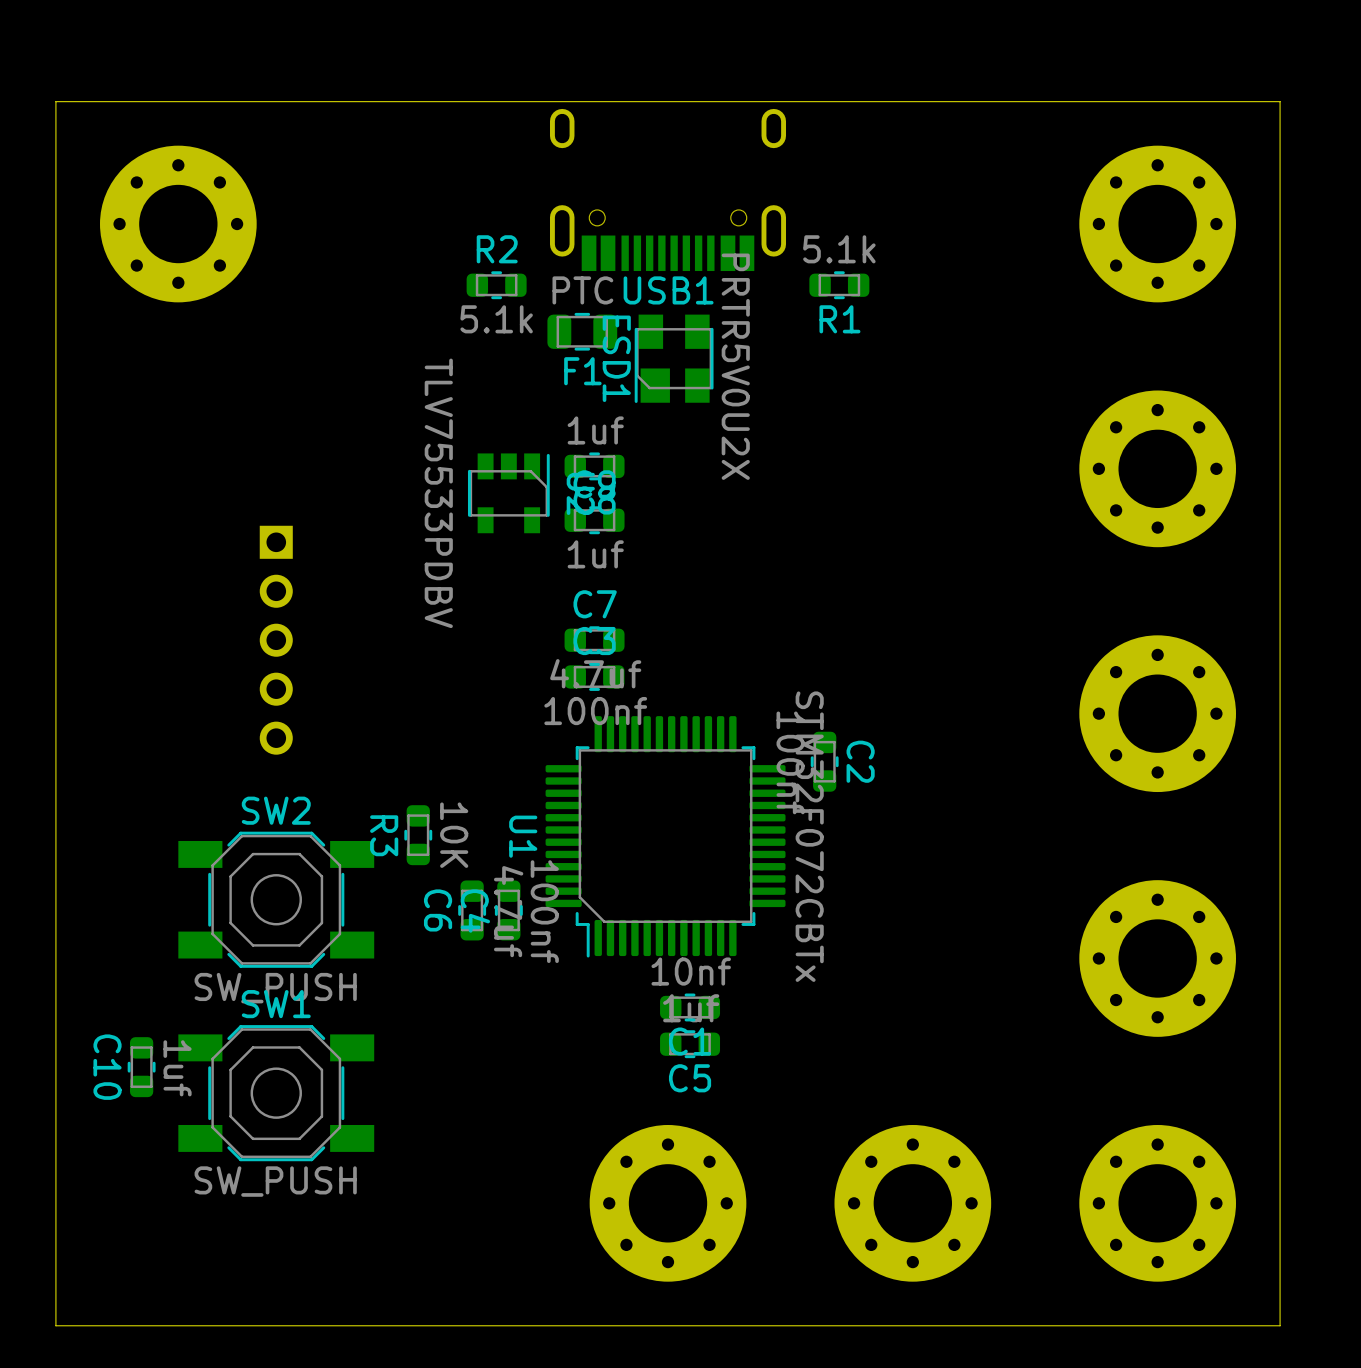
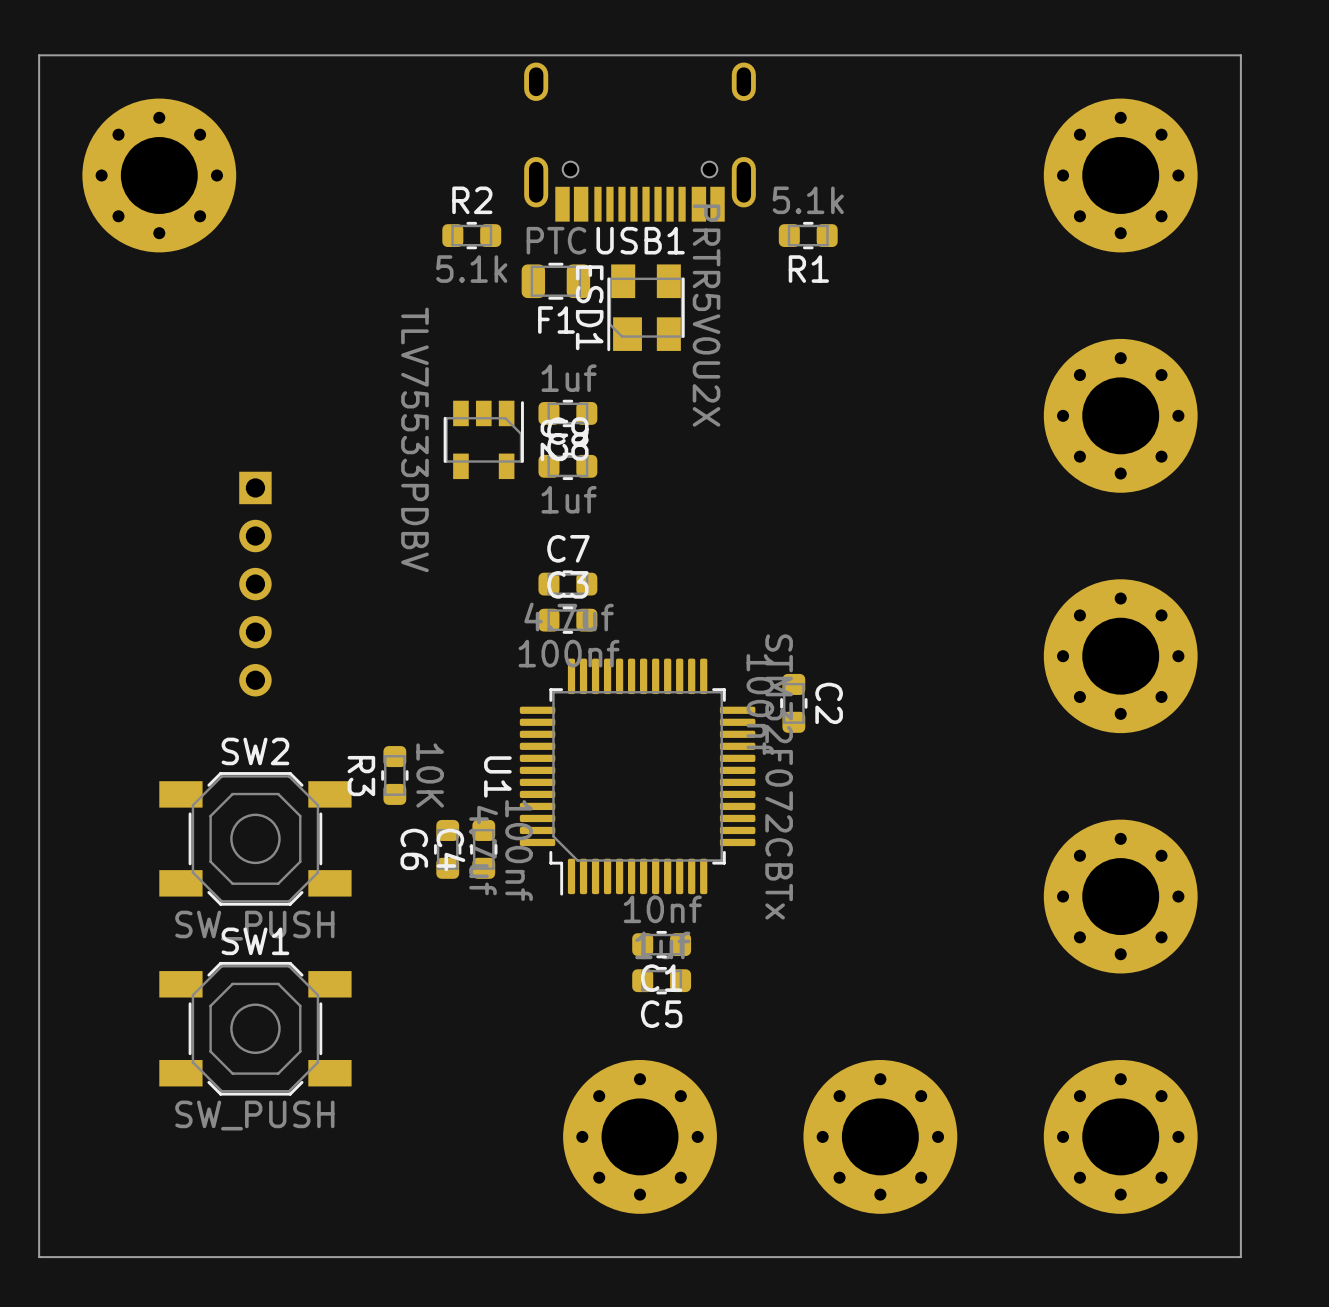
C10: 1uf (141, 1067) -> none

